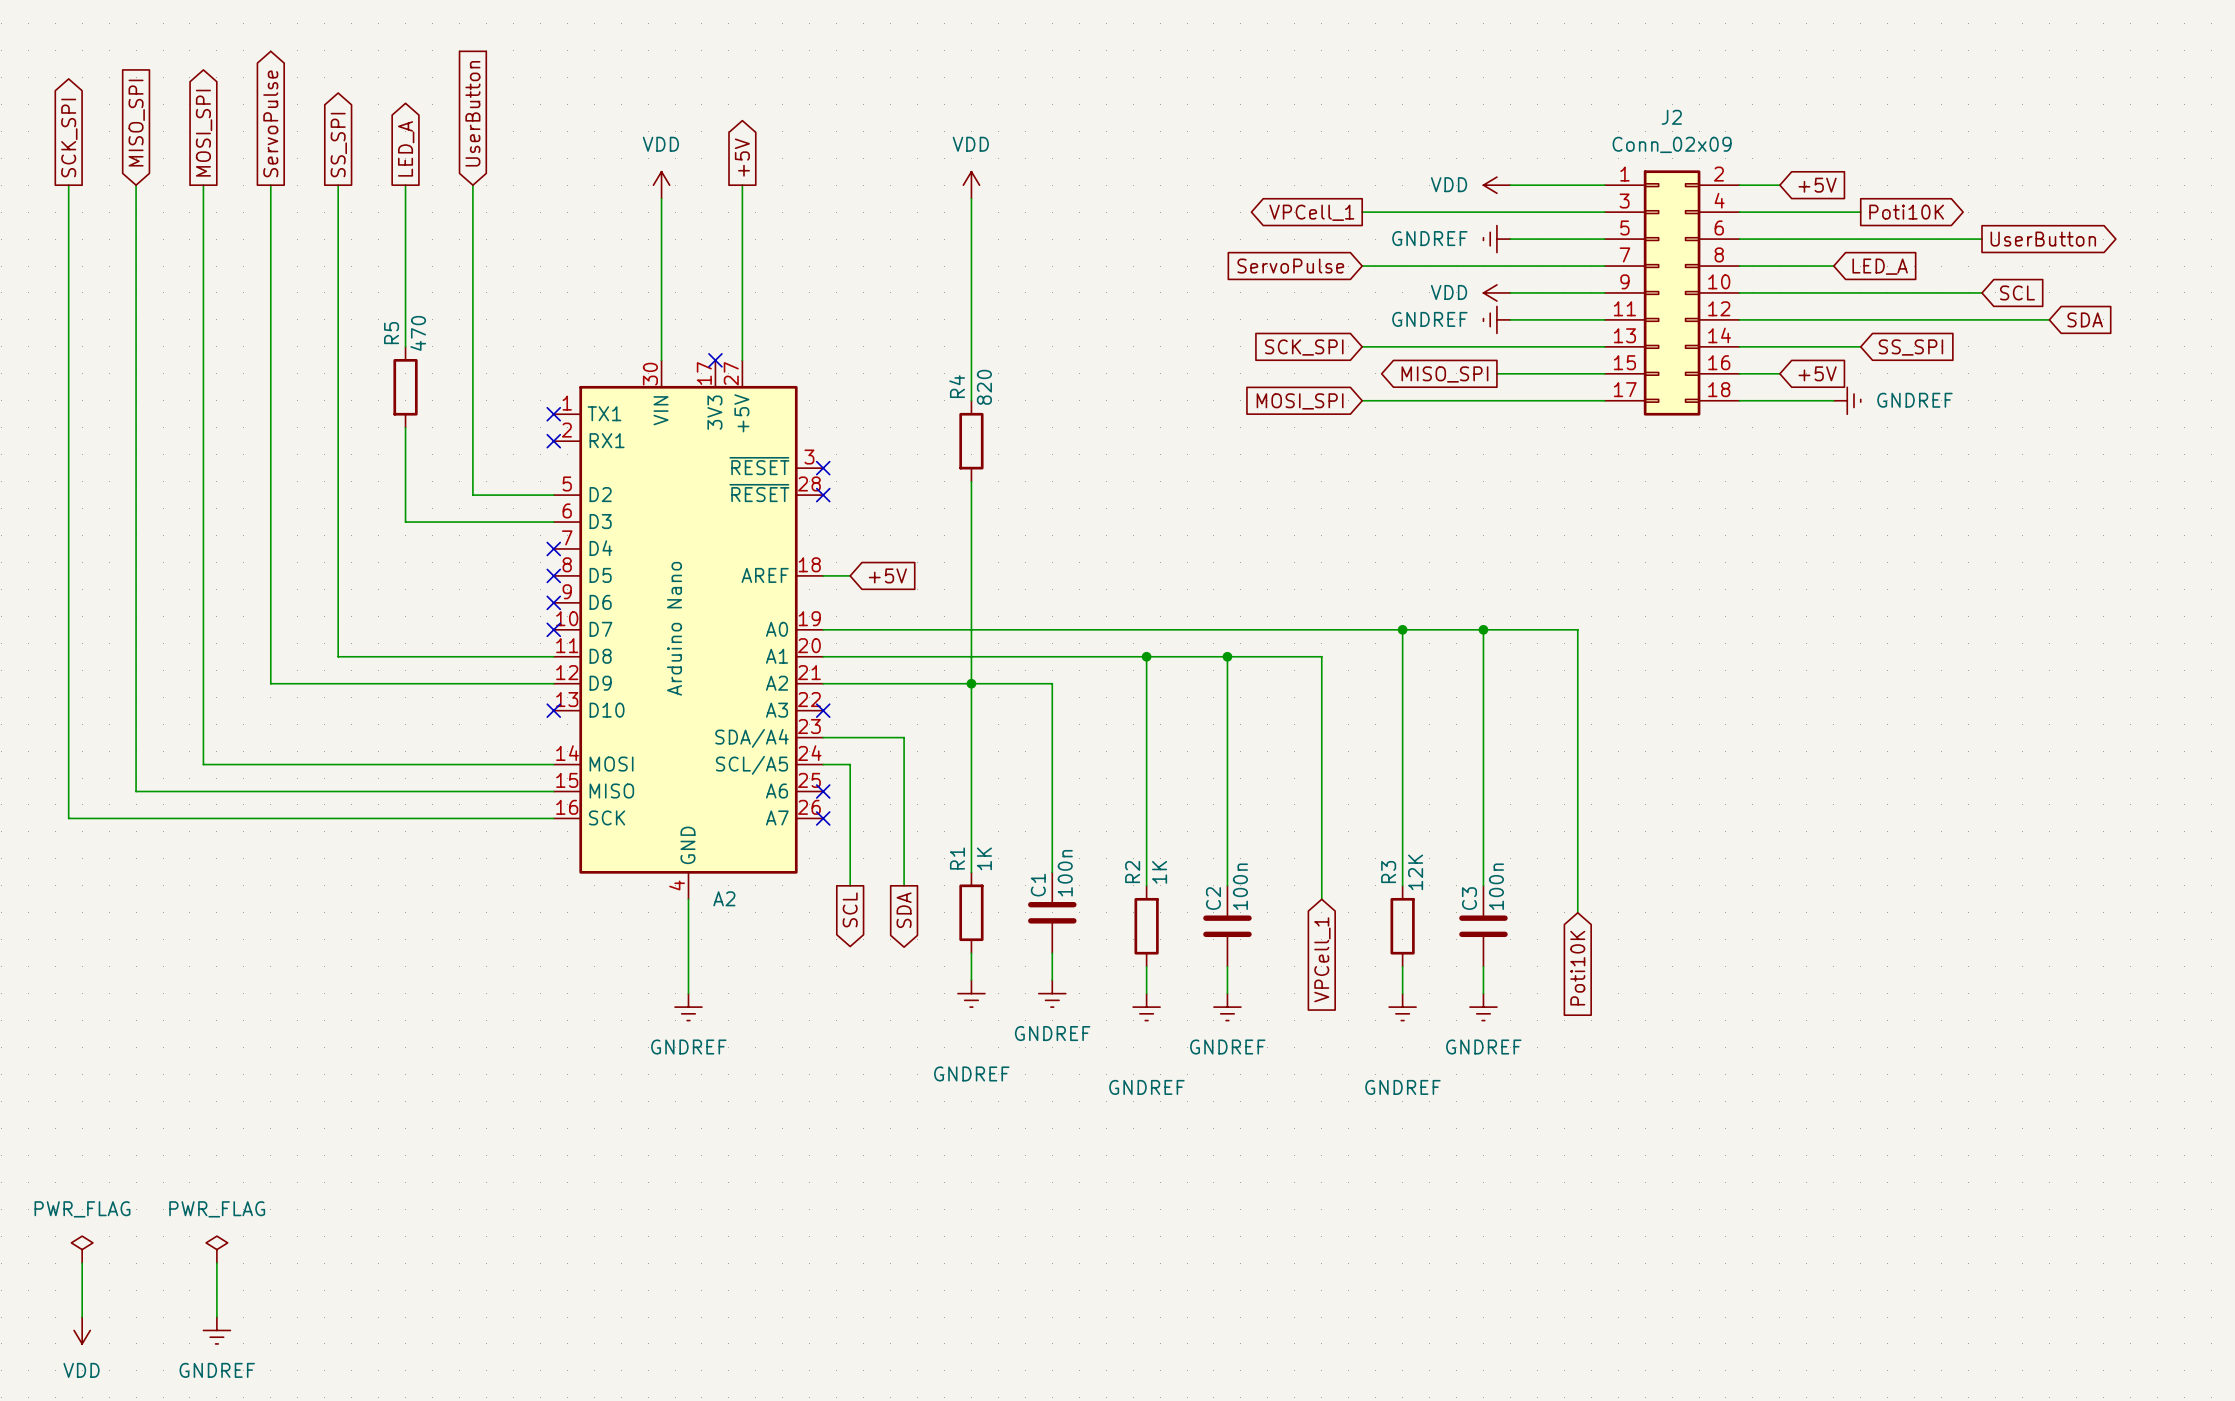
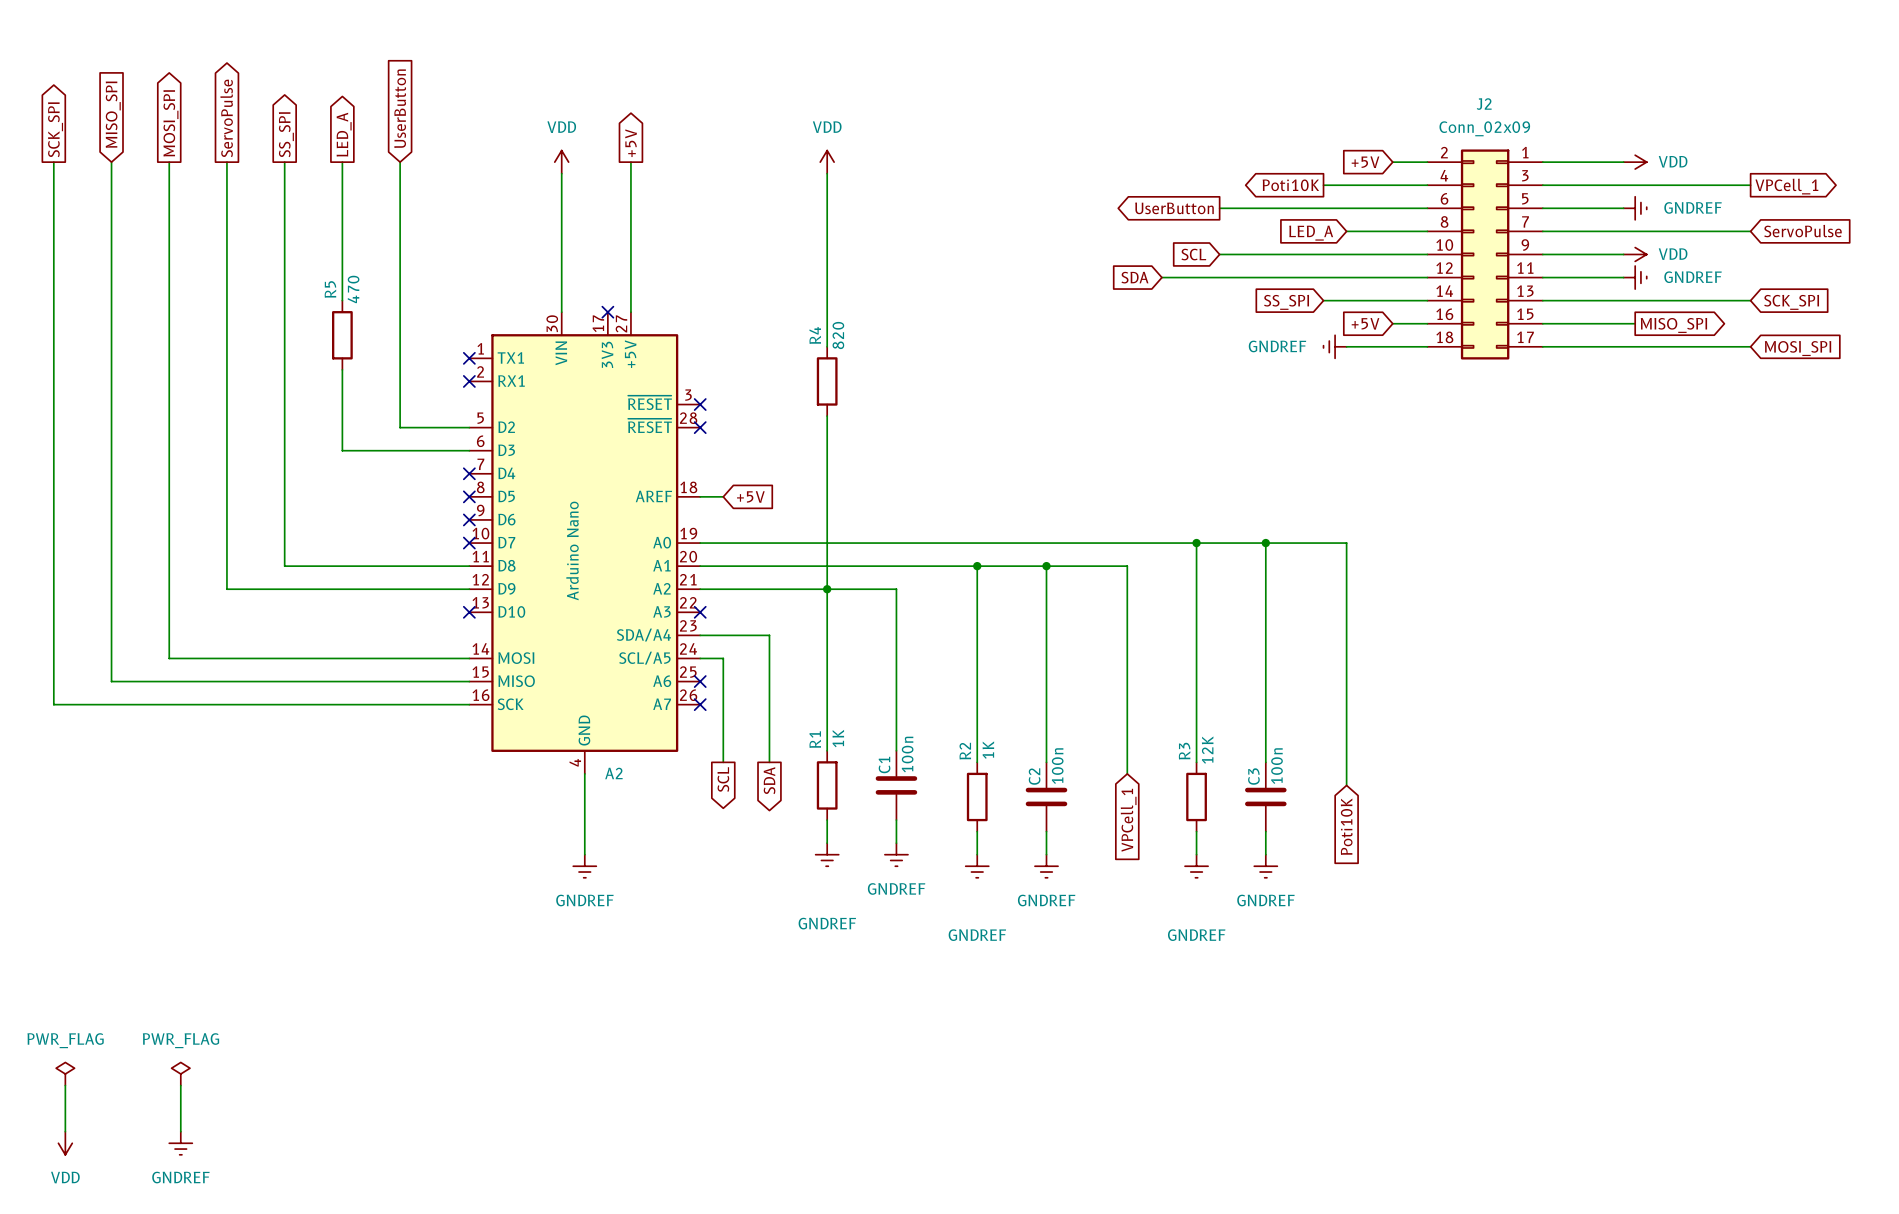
power symbol: VDD (1496, 185) -> none
wire: (1510, 185) (1604, 185) -> none
global label: none -> +5V (1365, 162)
wire: none -> (1542, 162) (1623, 162)
global label: +5V (1817, 185) -> none
power symbol: none -> VDD (1635, 162)
global label: VPCell_1 (1311, 212) -> none
wire: (1362, 212) (1550, 212) -> none
global label: none -> Poti10K (1290, 185)
wire: none -> (1589, 185) (1750, 185)
global label: Poti10K (1906, 212) -> none
global label: none -> VPCell_1 (1786, 186)
global label: none -> UserButton (1174, 208)
wire: none -> (1219, 208) (1288, 208)
power symbol: GNDREF (1496, 239) -> none
wire: (1901, 239) (1982, 239) -> none
power symbol: none -> GNDREF (1635, 208)
global label: UserButton (2043, 239) -> none
global label: ServoPulse (1290, 266) -> none
wire: (1362, 266) (1577, 266) -> none
wire: none -> (1565, 231) (1750, 231)
global label rotation: 0° (1880, 266) -> 180° (1311, 233)
global label position: LED_A (1880, 266) -> LED_A (1311, 233)
global label: none -> ServoPulse (1802, 231)
global label: none -> SCL (1193, 254)
wire: none -> (1219, 254) (1288, 254)
power symbol: VDD (1496, 292) -> none
J2 flip: as is (1672, 292) -> left-right (1485, 254)
wire: (1901, 292) (1982, 292) -> none
power symbol: none -> VDD (1635, 254)
global label: SCL (2017, 292) -> none
global label: none -> SDA (1134, 277)
wire: none -> (1161, 277) (1288, 277)
power symbol: GNDREF (1496, 319) -> none
wire: (1901, 319) (2049, 319) -> none
power symbol: none -> GNDREF (1635, 277)
global label: SDA (2085, 319) -> none
wire: (1362, 346) (1550, 346) -> none
wire: none -> (1589, 300) (1750, 300)
global label: SCK_SPI (1304, 347) -> none
global label shape: input (1910, 347) -> output (1673, 325)
global label: SS_SPI (1910, 347) -> MISO_SPI (1673, 325)
global label: none -> SCK_SPI (1791, 302)
wire: (1496, 373) (1604, 373) -> none
global label: none -> +5V (1365, 323)
wire: none -> (1542, 323) (1635, 323)
global label: +5V (1817, 373) -> none
global label shape: output (1444, 374) -> input (1286, 302)
global label: MISO_SPI (1444, 374) -> SS_SPI (1286, 302)
wire: (1362, 400) (1577, 400) -> none
power symbol: none -> GNDREF (1335, 346)
wire: none -> (1565, 346) (1750, 346)
power symbol: GNDREF (1847, 400) -> none
global label: MOSI_SPI (1300, 401) -> none
global label: none -> MOSI_SPI (1798, 348)

